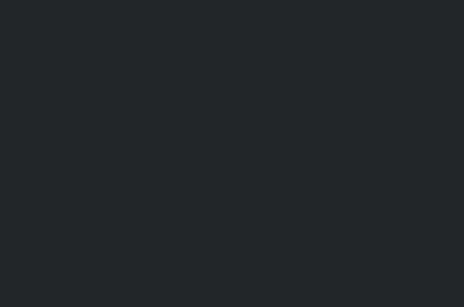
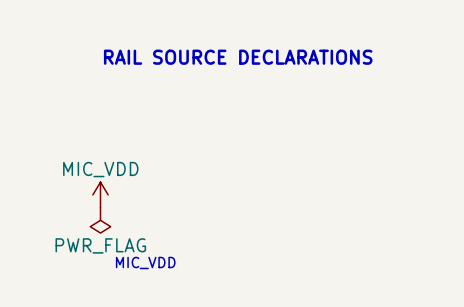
text: none -> RAIL SOURCE DECLARATIONS (238, 57)
power symbol: none -> MIC_VDD (100, 194)
power symbol: none -> PWR_FLAG (100, 220)
text: none -> MIC_VDD (145, 262)

